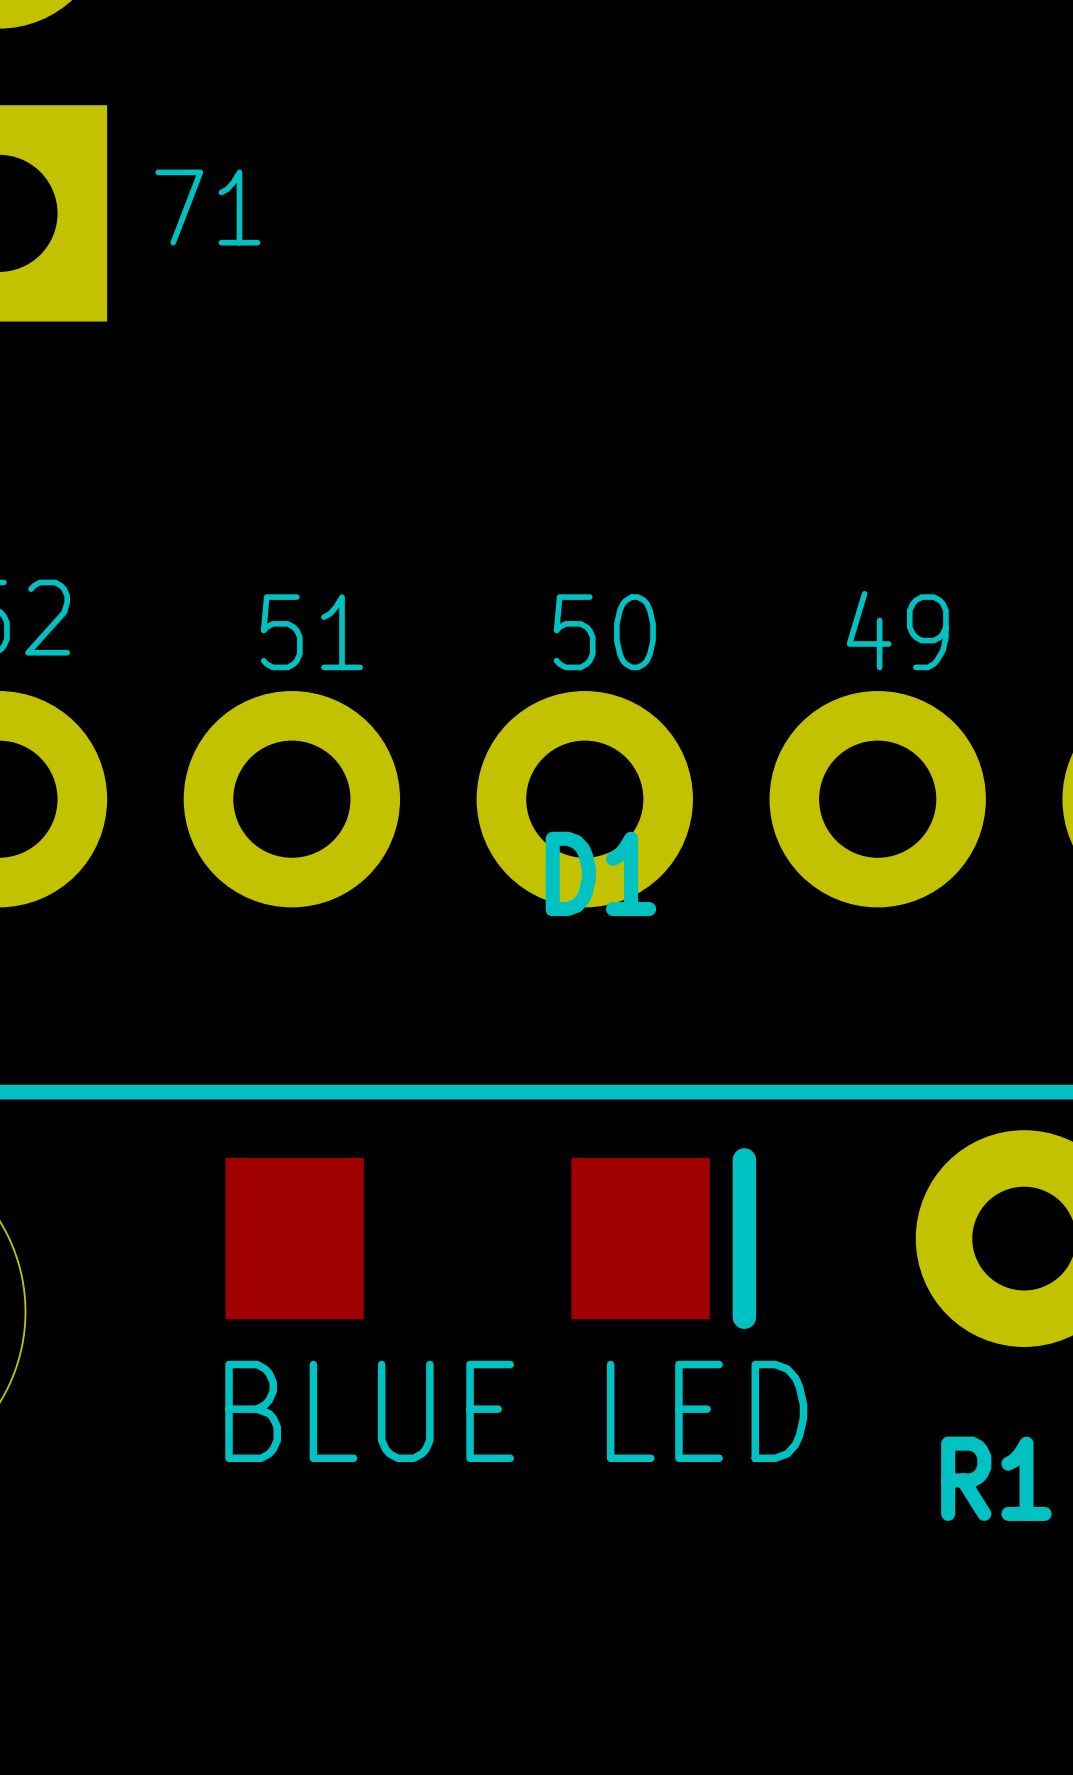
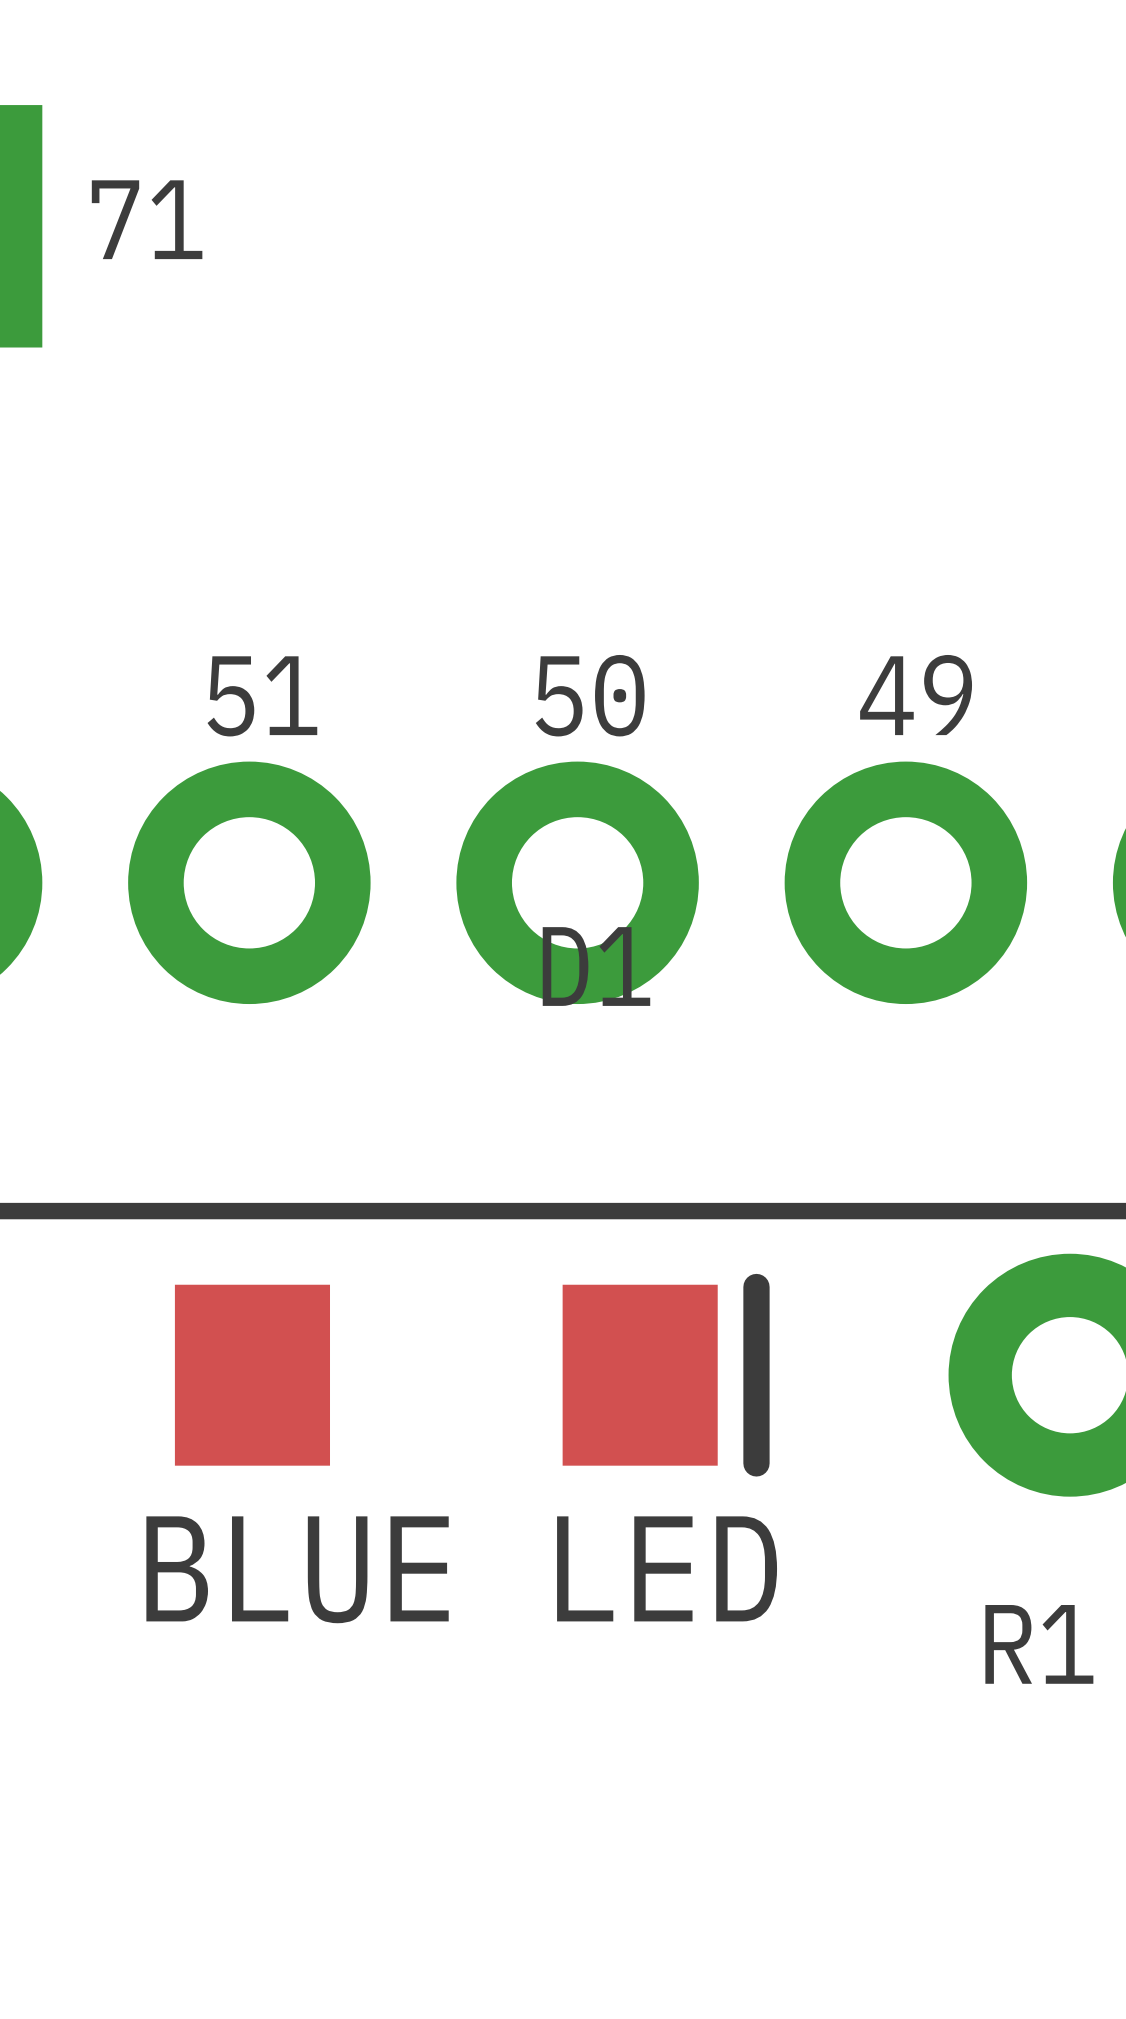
text position: BLUE LED (516, 1411) -> BLUE LED (461, 1569)

